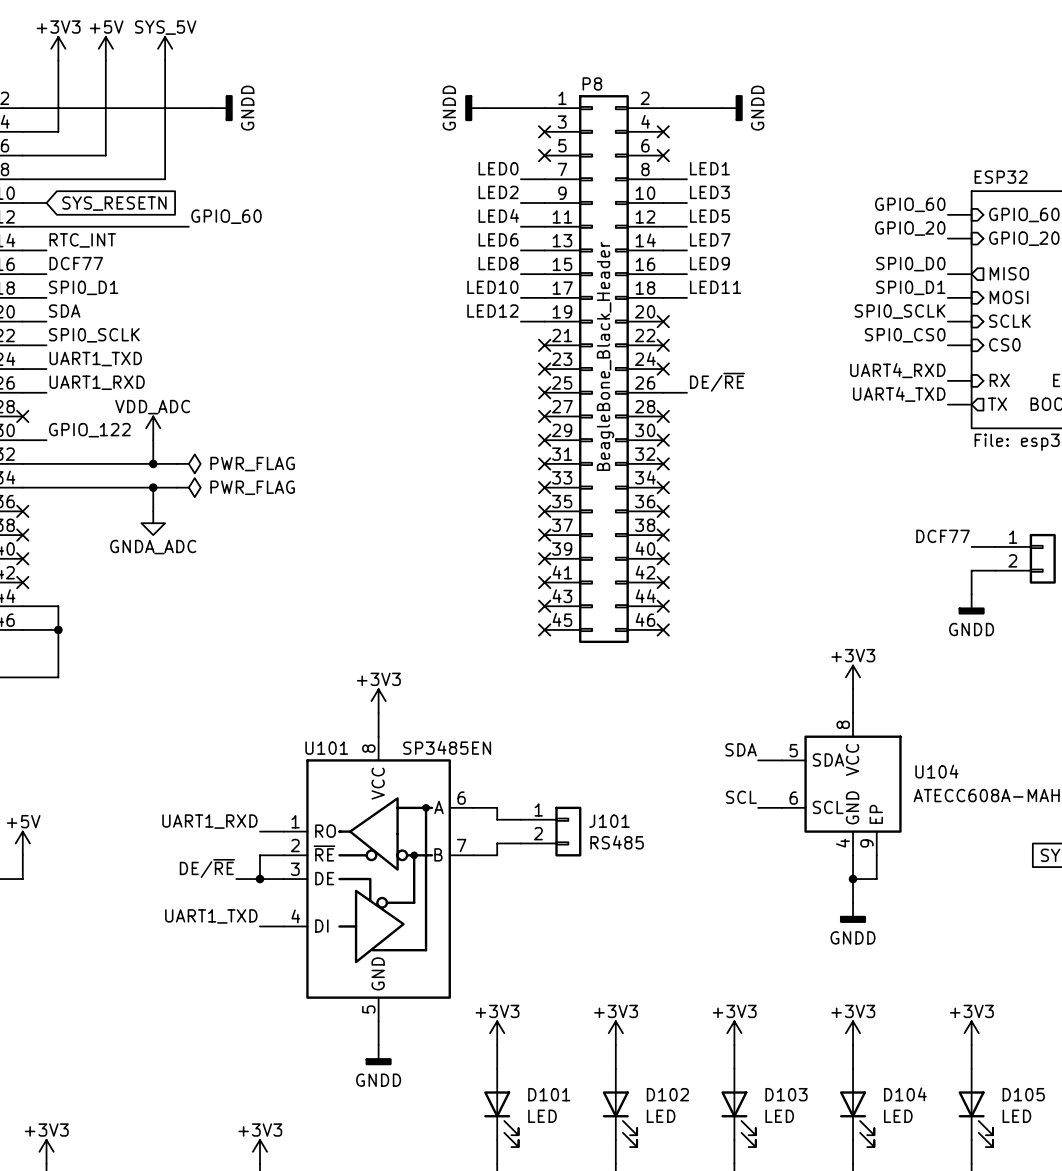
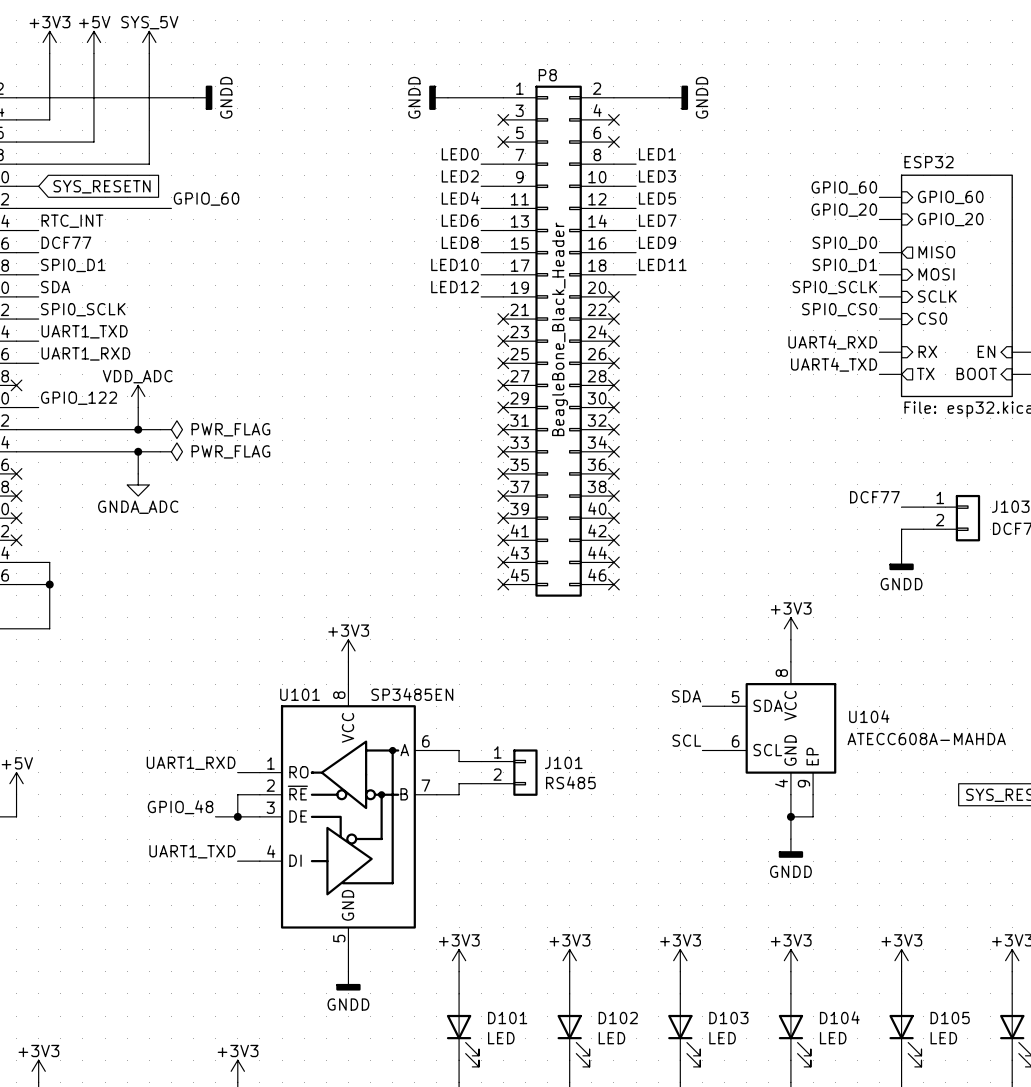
label: DE/~{RE} (717, 382) -> none
wire: (663, 392) (686, 392) -> none
no-connect mark: none -> (613, 363)
label: DE/~{RE} (207, 868) -> GPIO_48 (180, 807)

